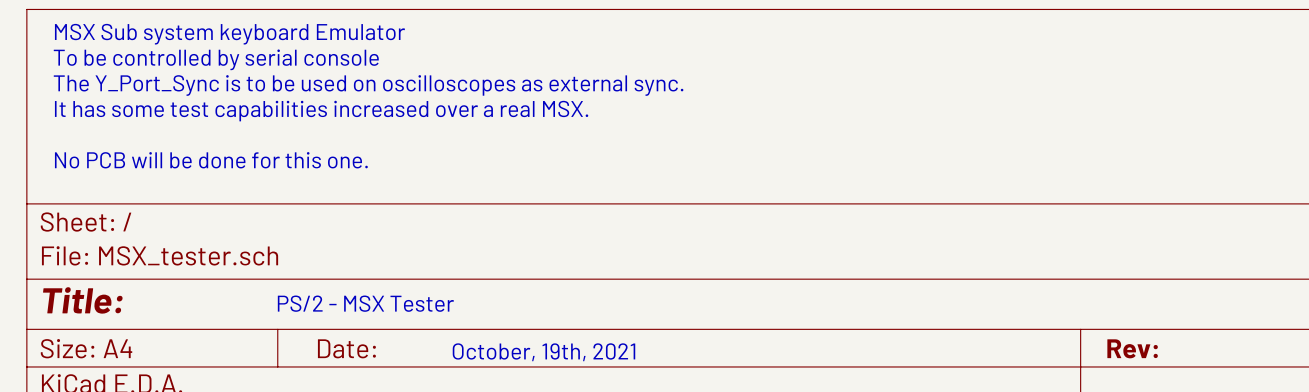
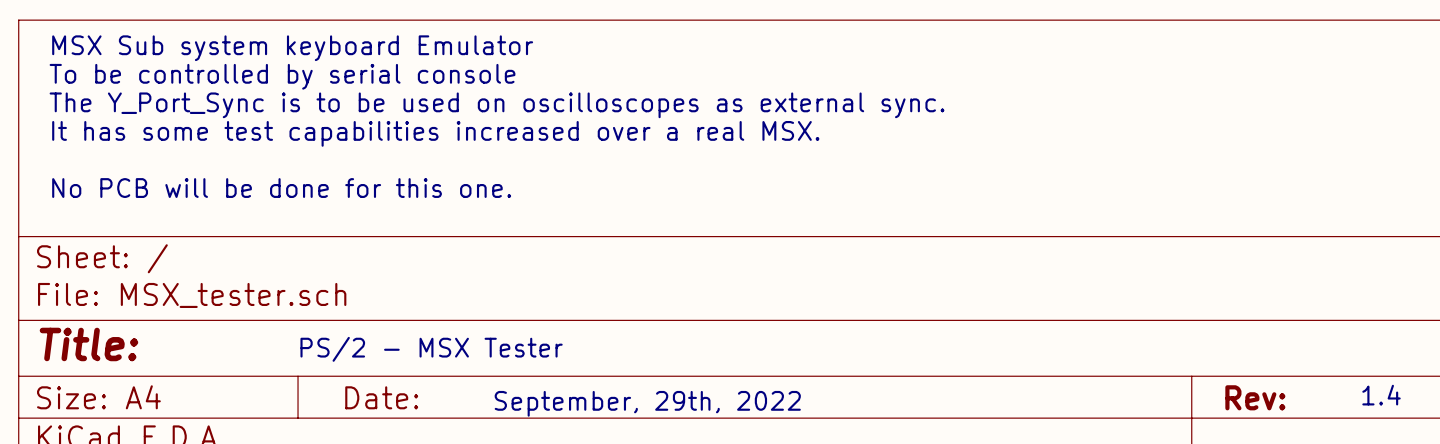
text: none -> 1.4 (1381, 395)
text: October, 19th, 2021 (543, 352) -> September, 29th, 2022 (647, 403)

